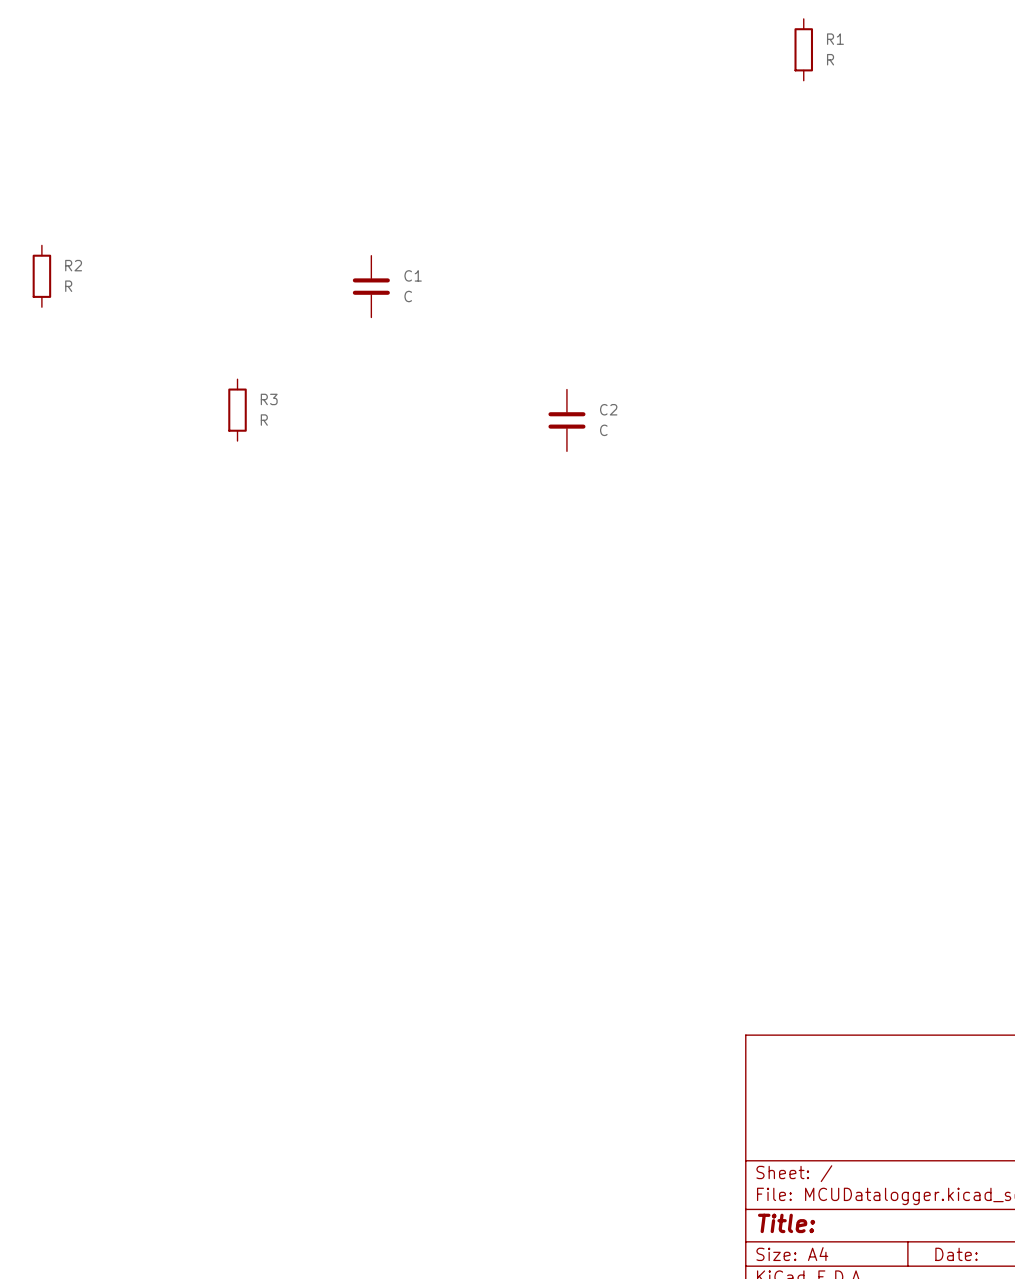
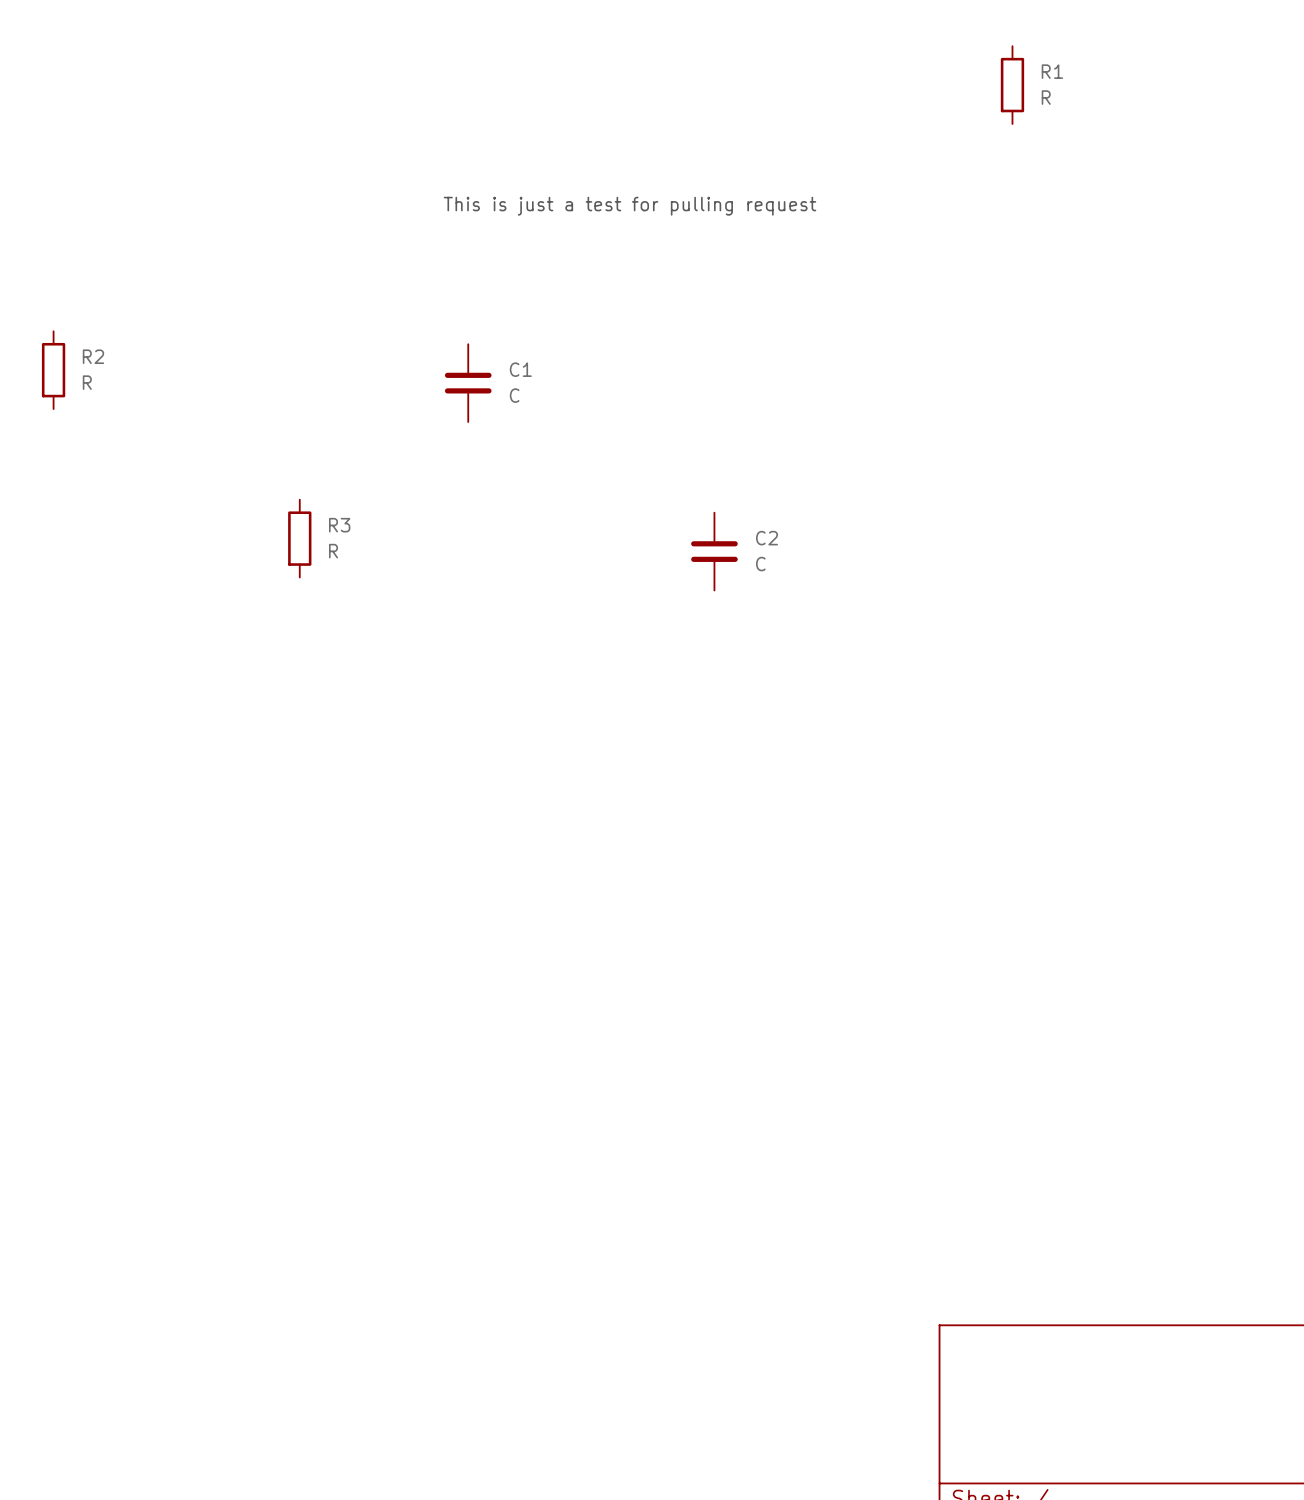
text: none -> This is just a test for pulling request (630, 206)

